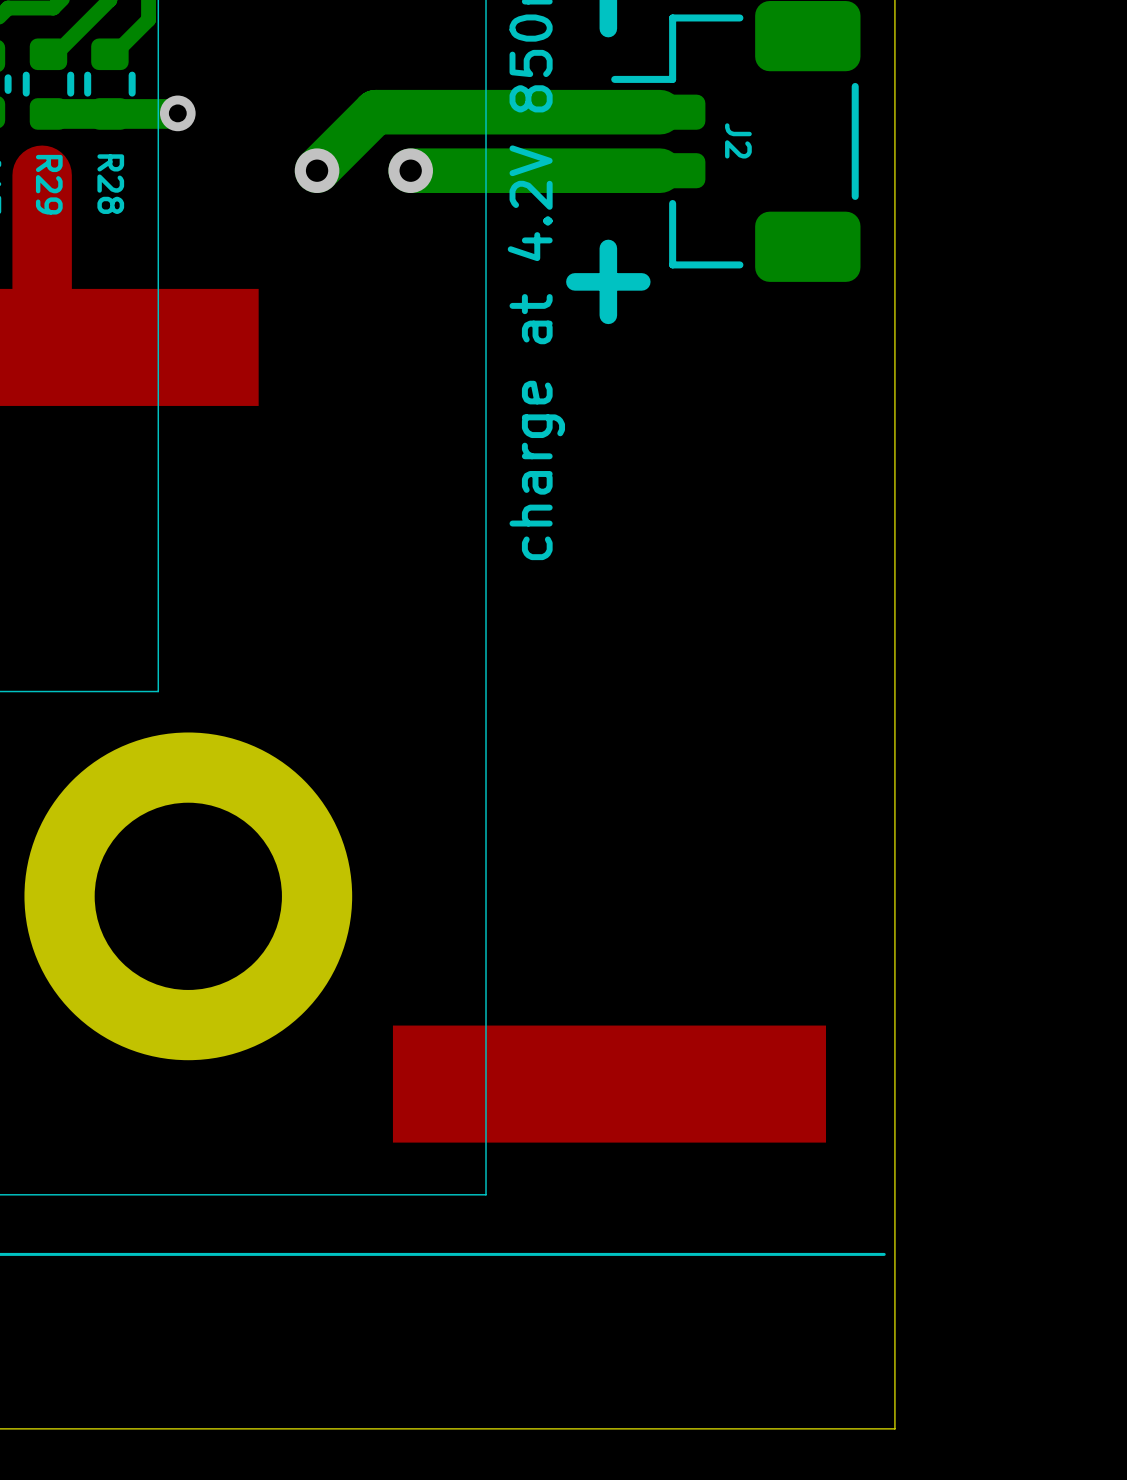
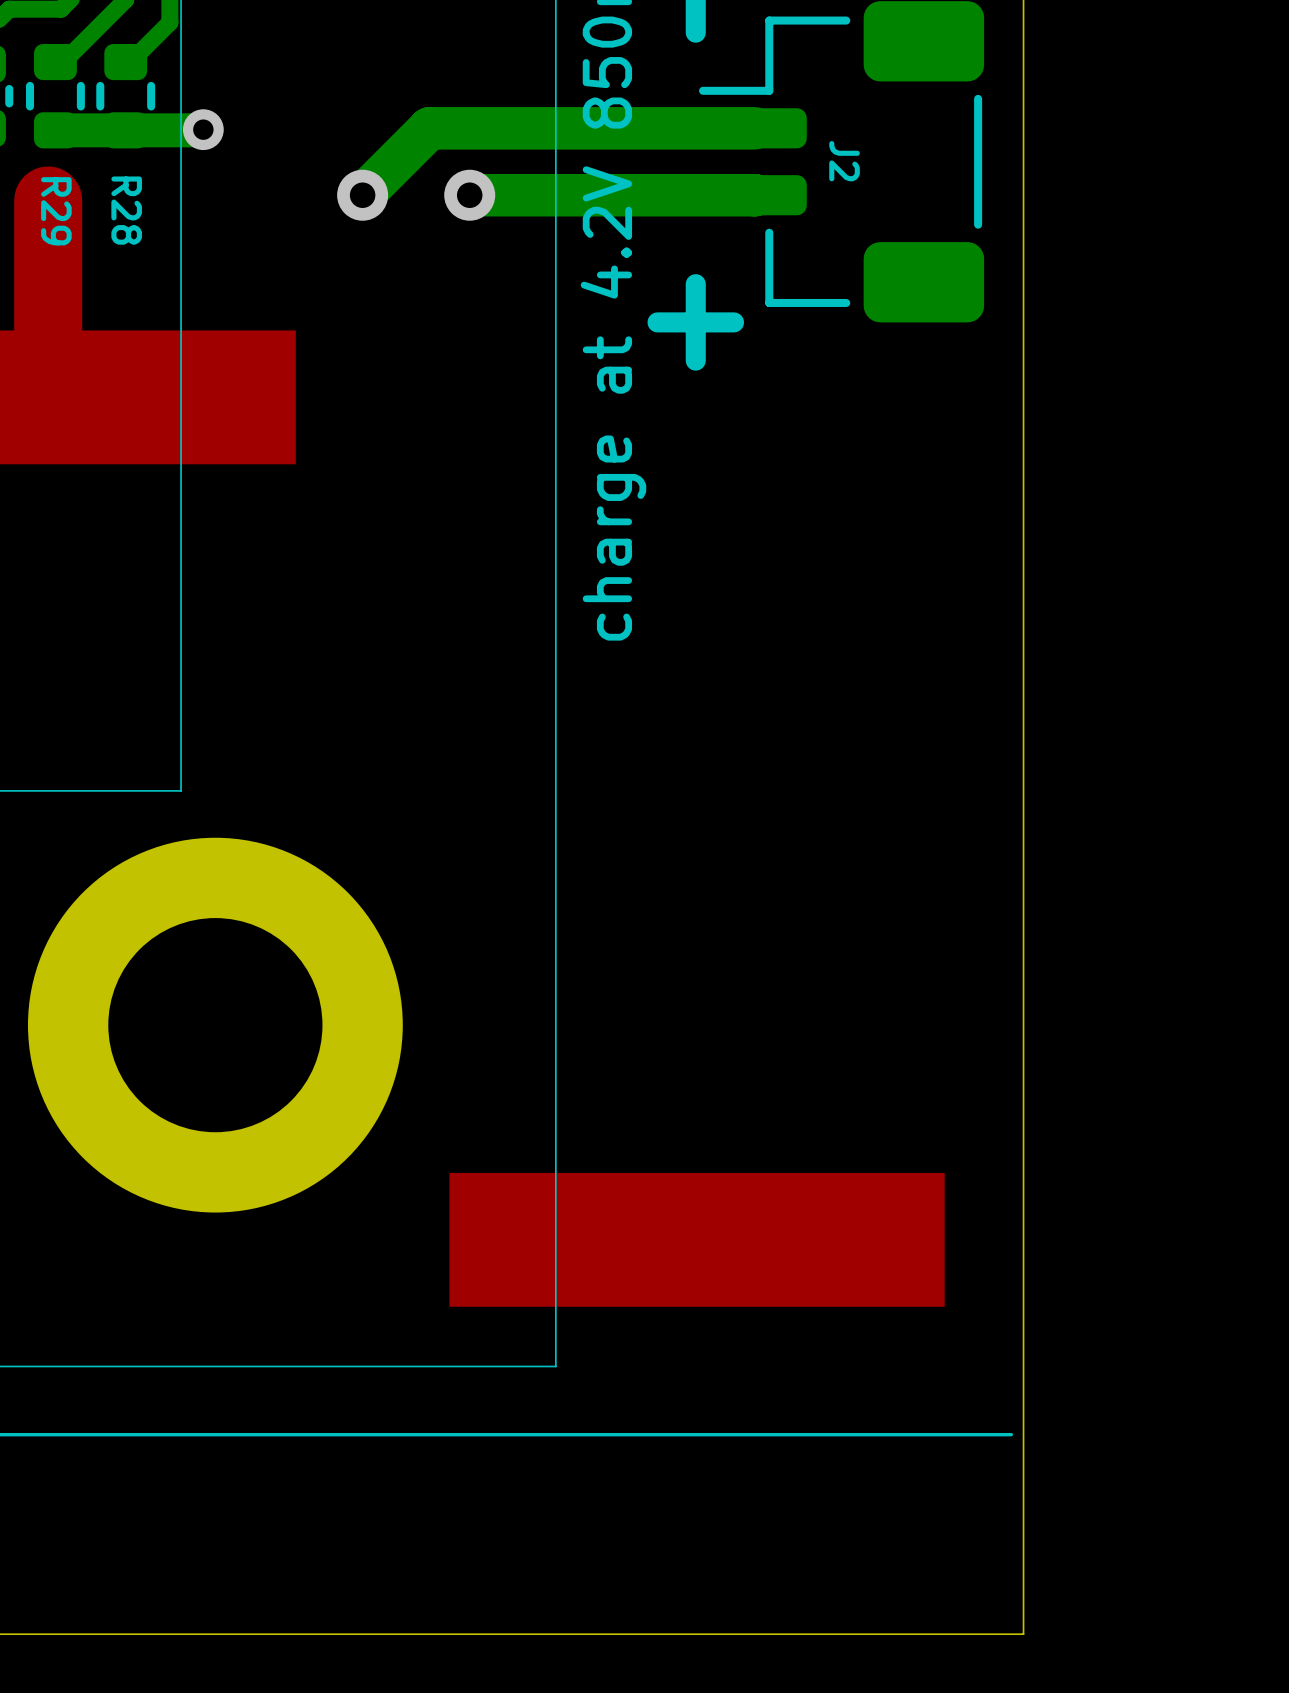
bottom track width: thick (660, 112) (375, 112) (317, 170) -> thin (754, 128) (429, 128) (362, 195)
bottom track width: thick (660, 170) (410, 170) -> thin (754, 195) (469, 195)

